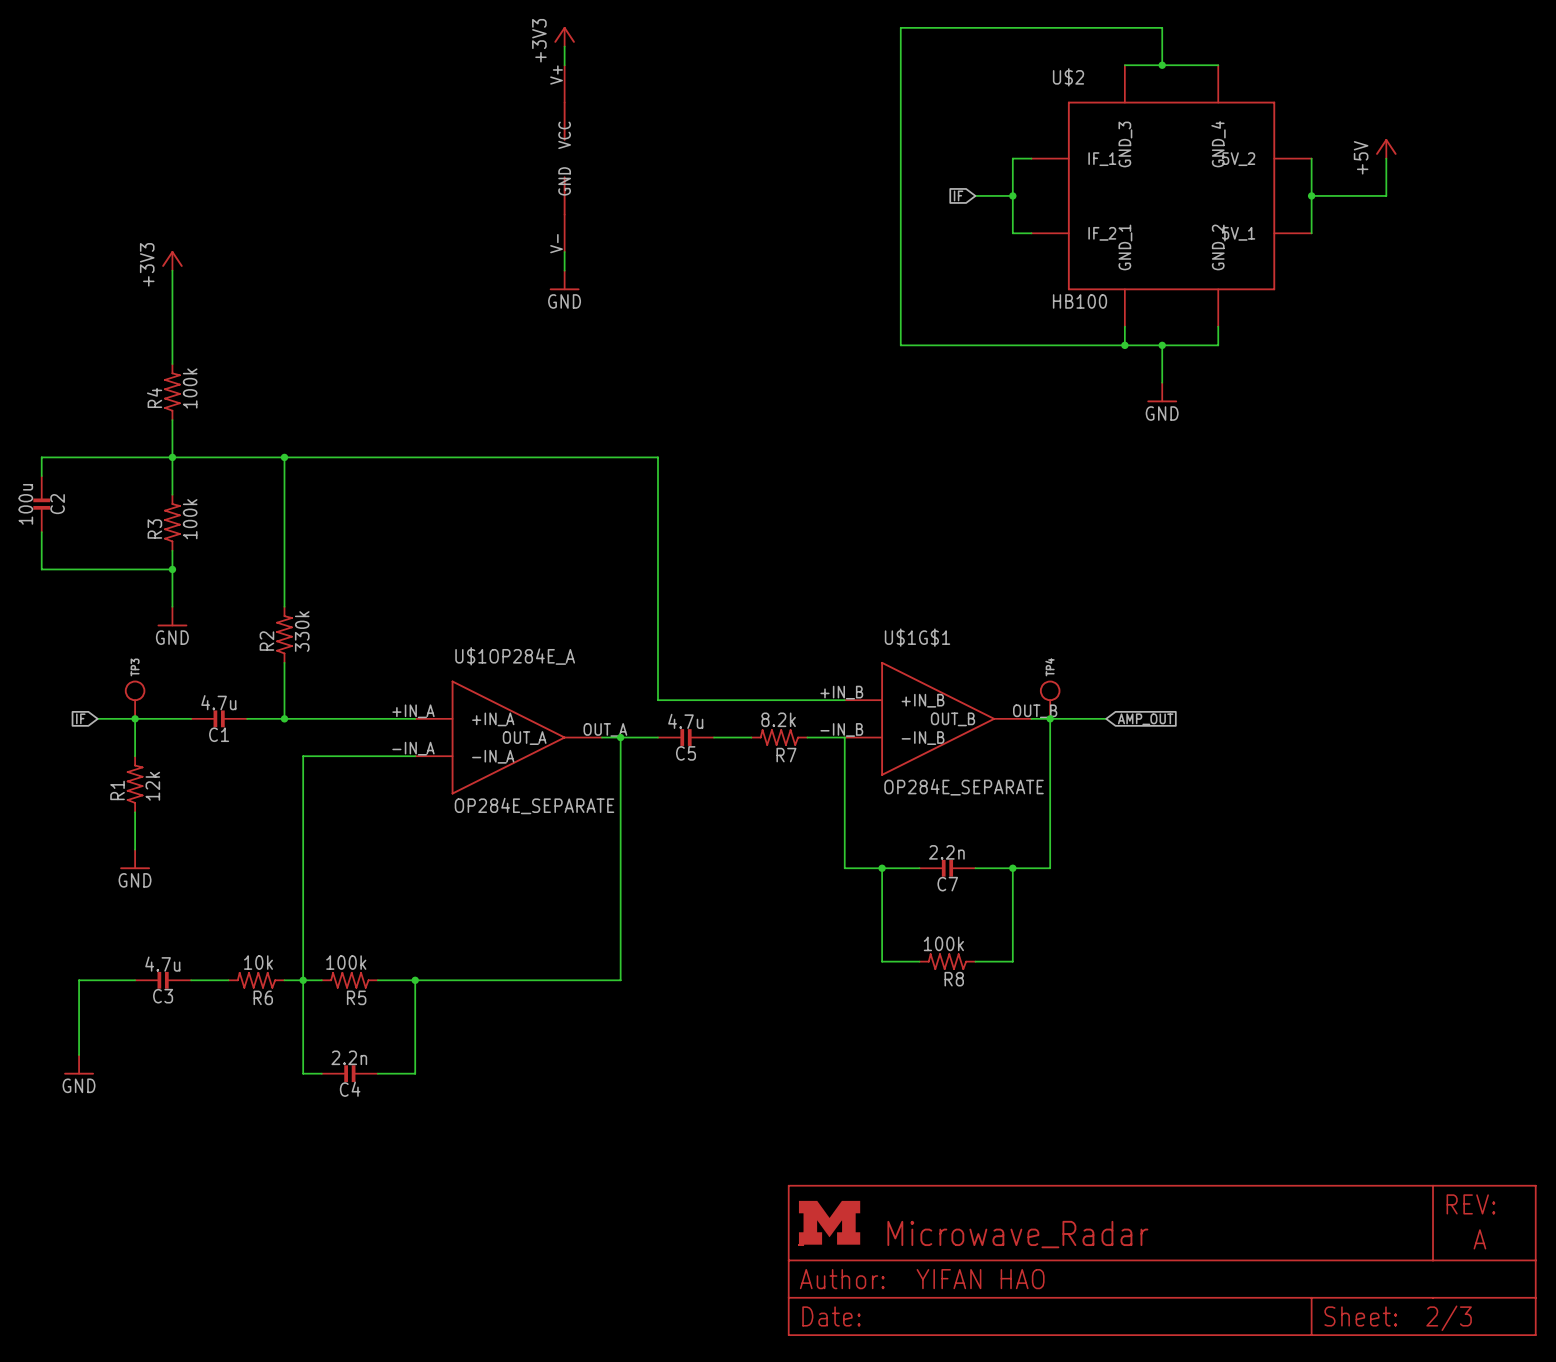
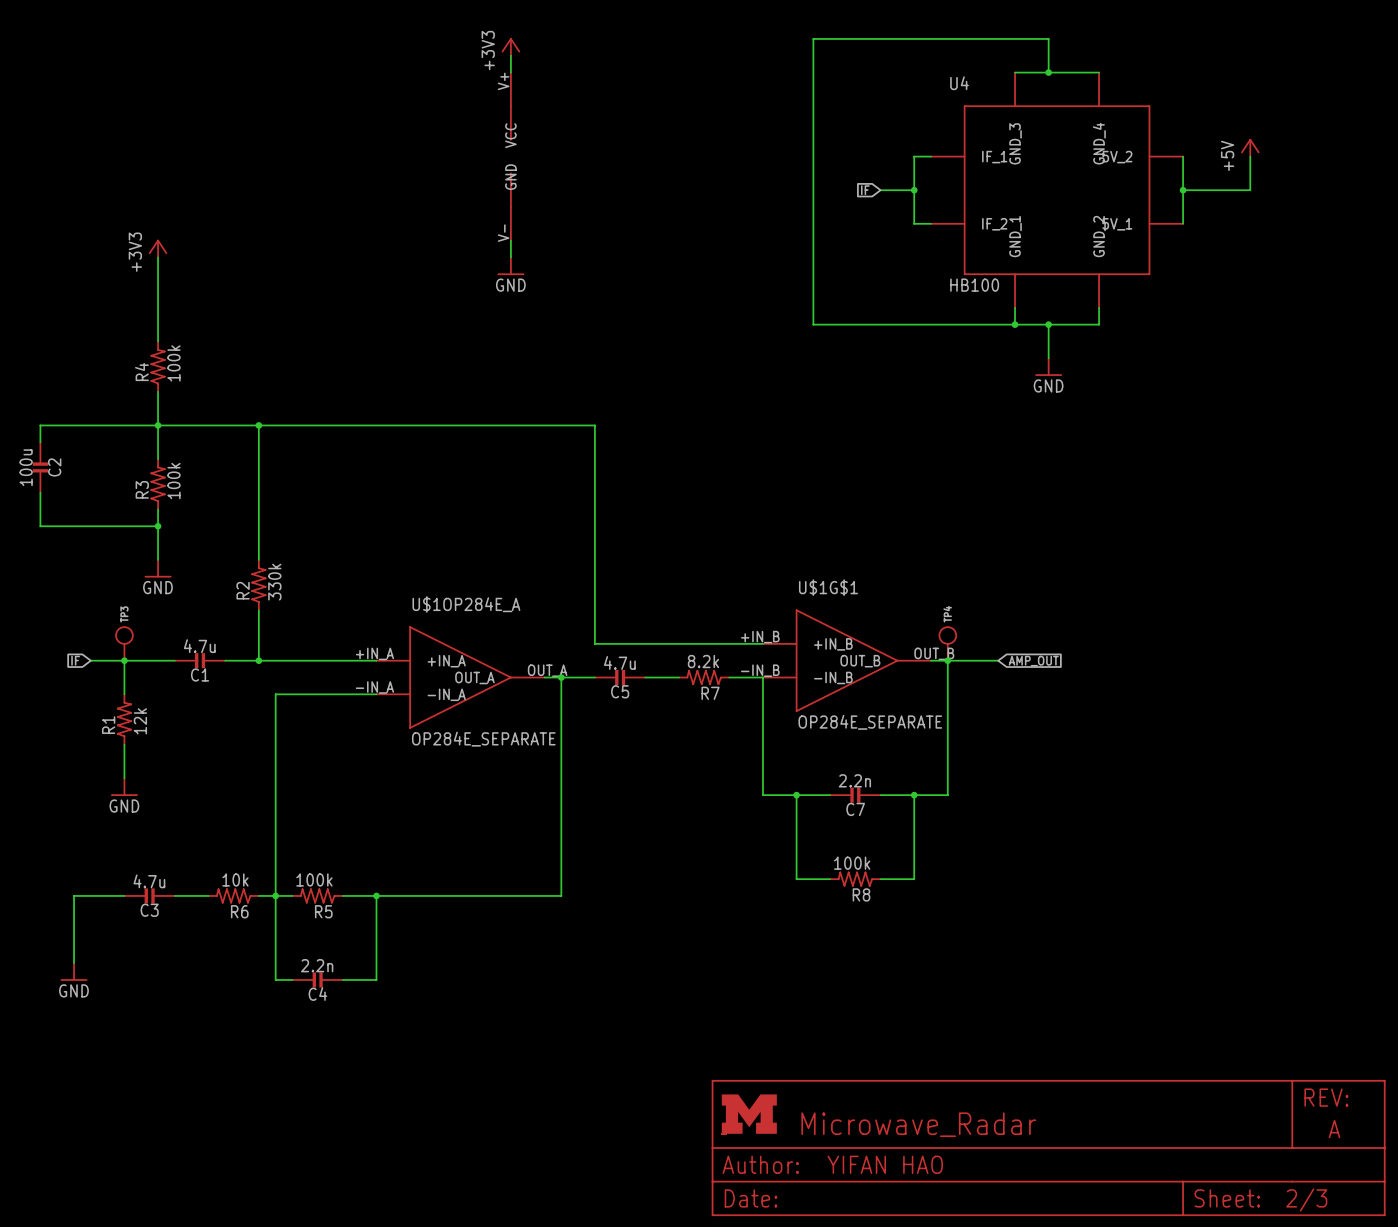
U$2 name: U$2 (1068, 77) -> U4 (959, 83)

